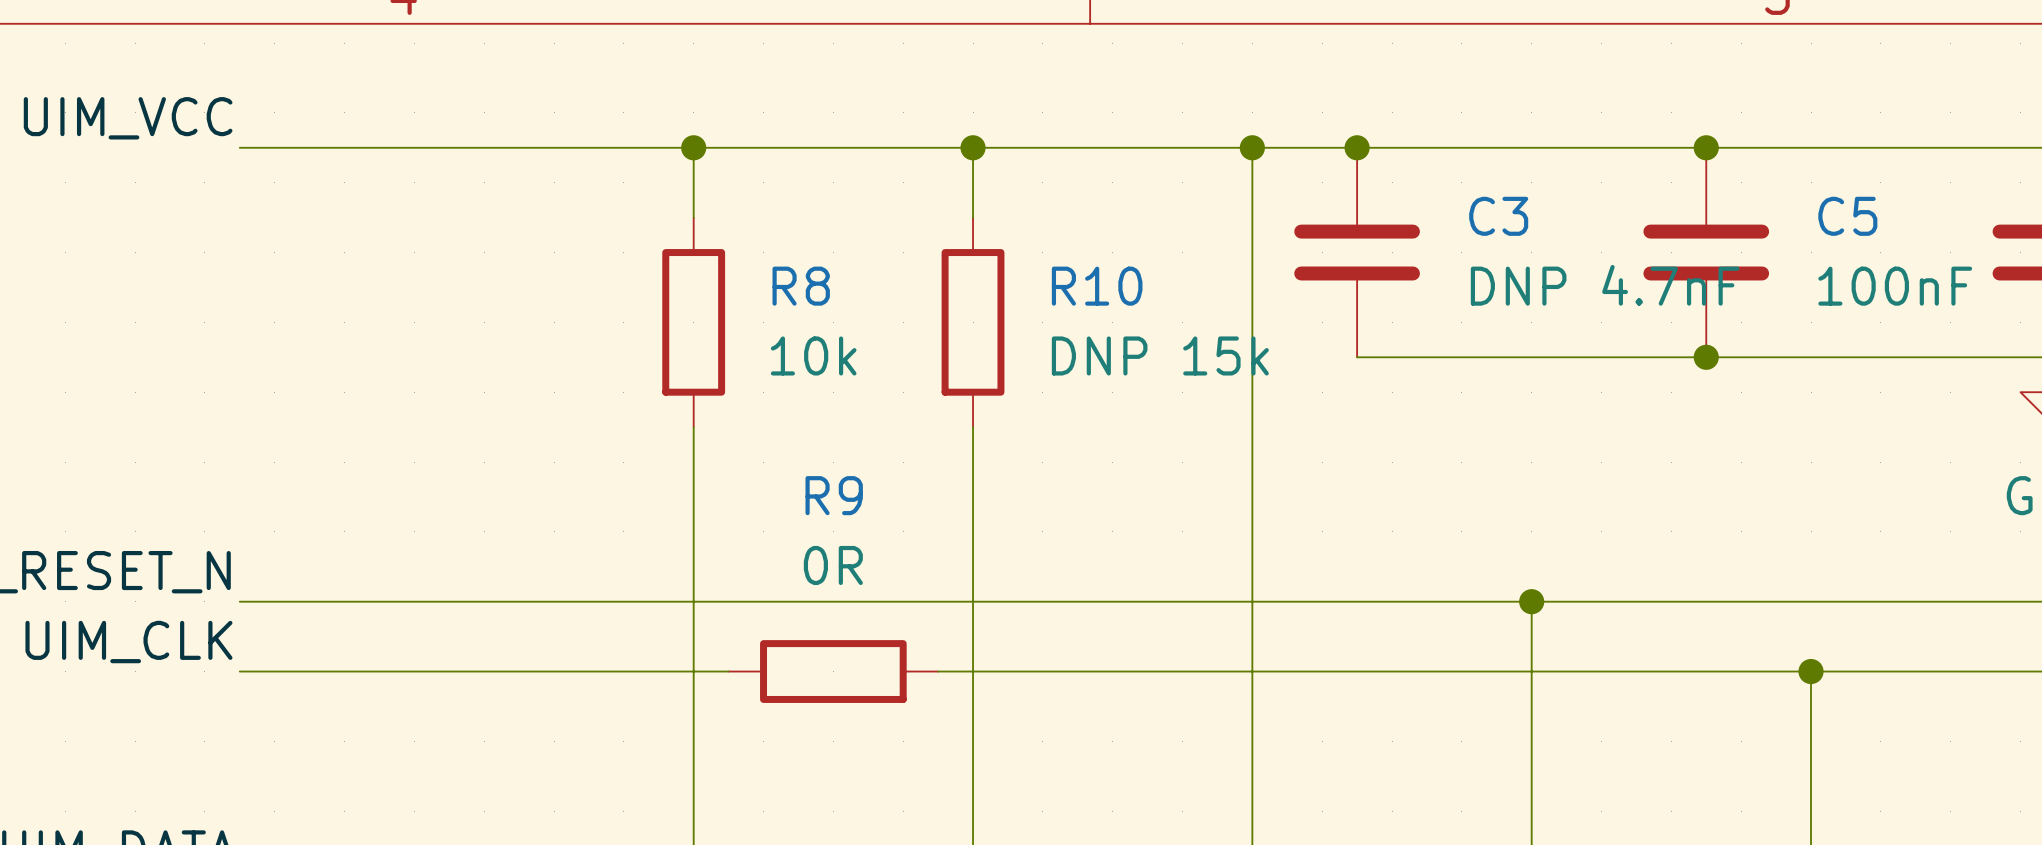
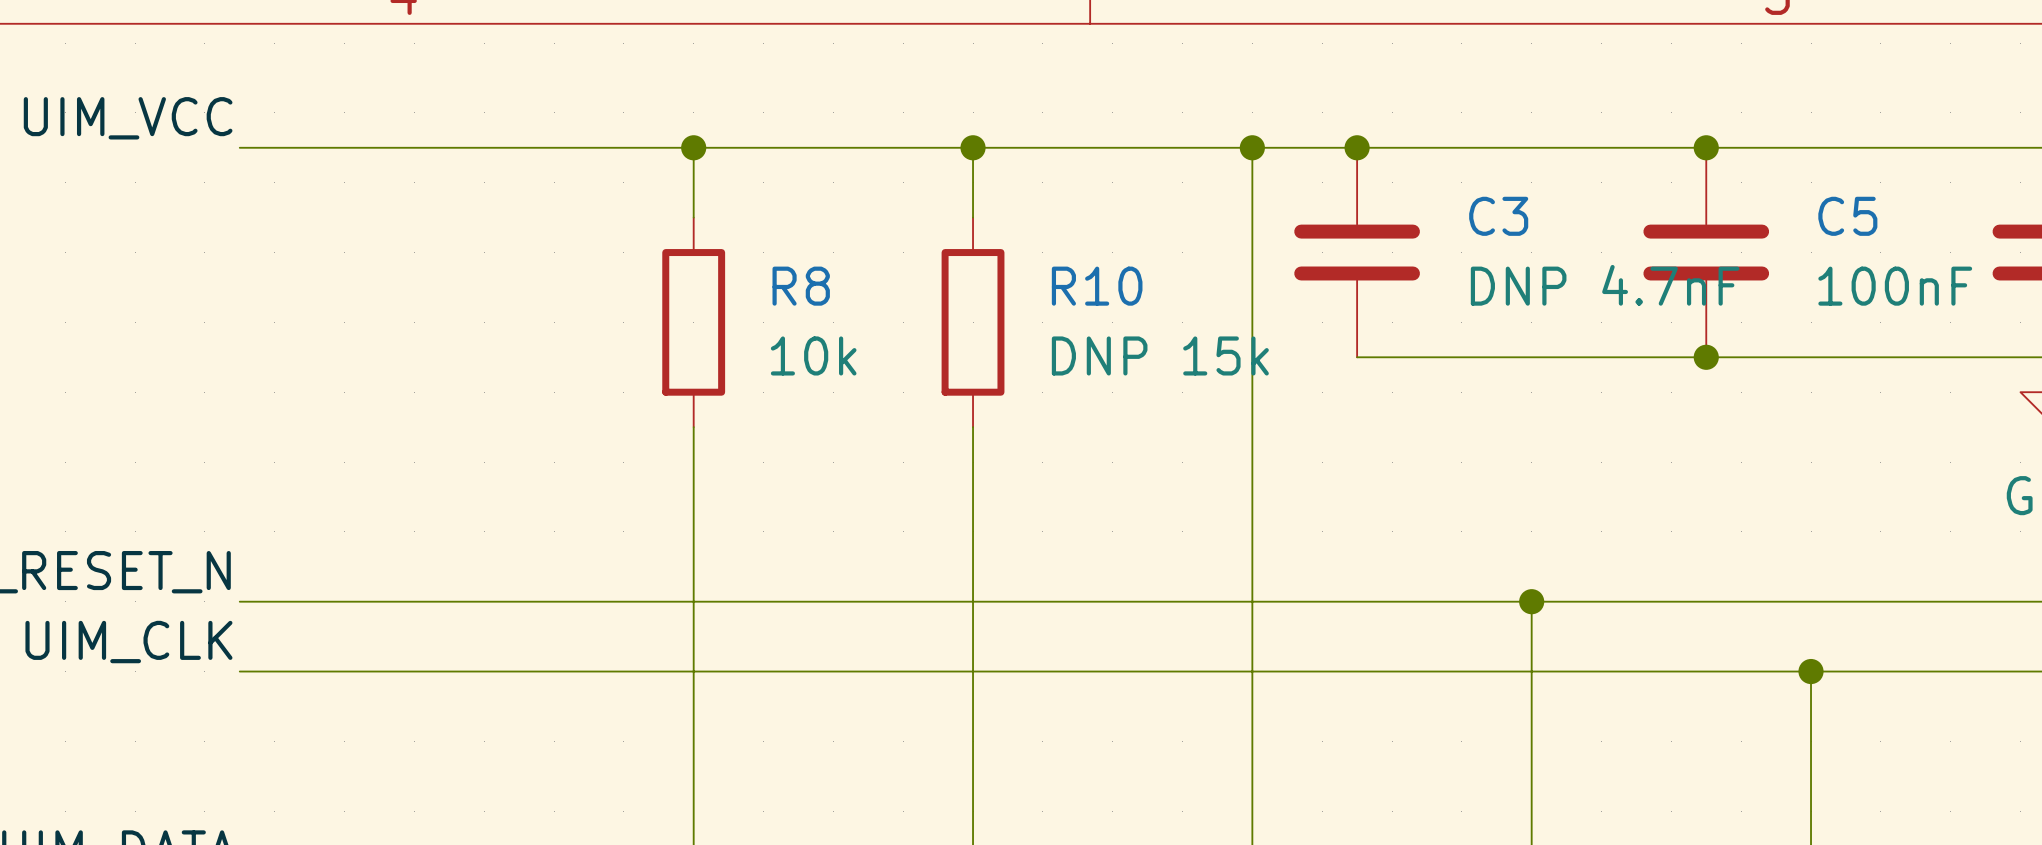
wire: none -> (728, 671) (938, 671)
R9: 0R (833, 671) -> none

